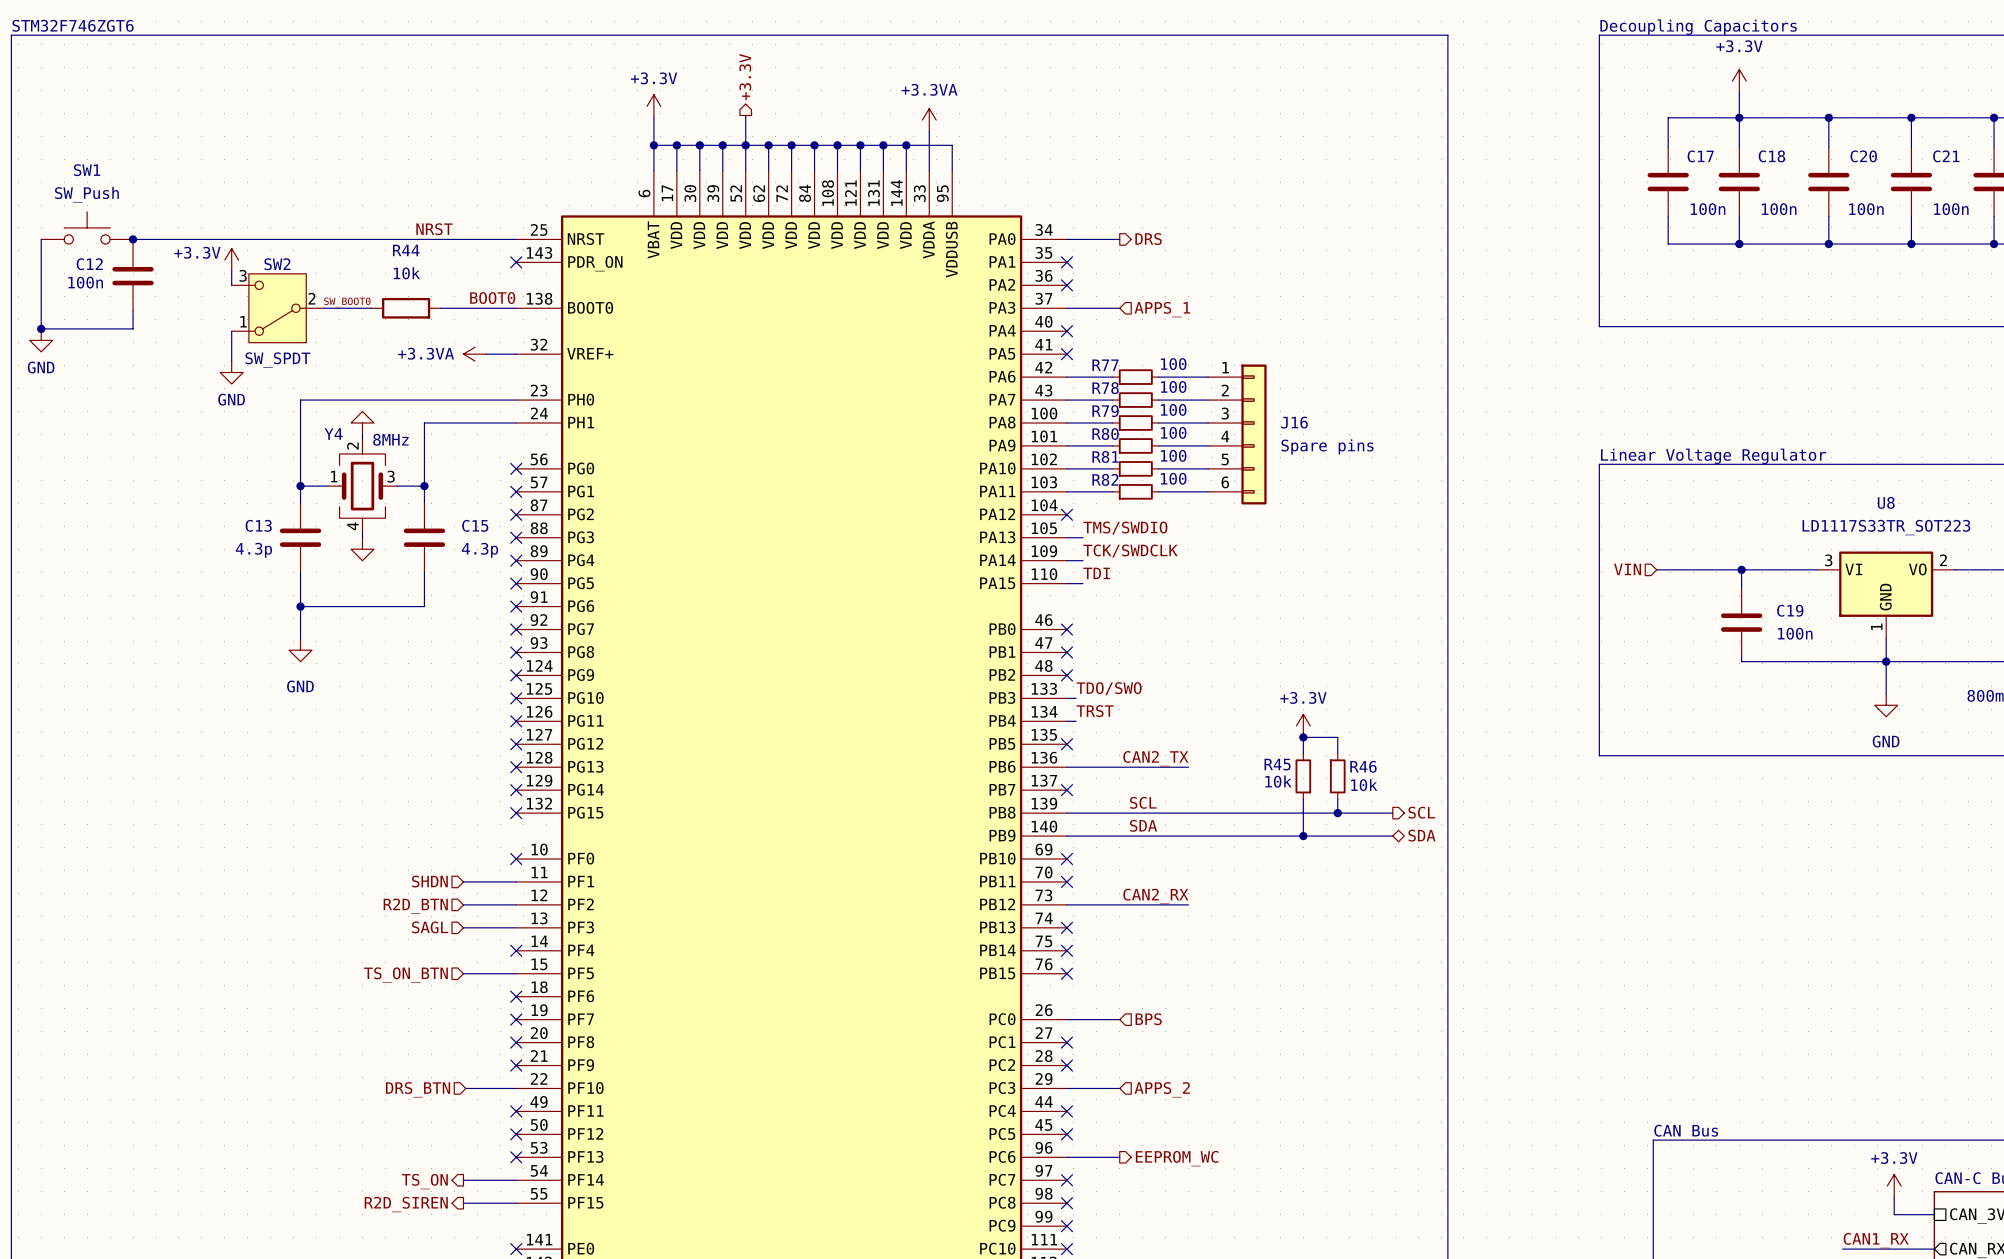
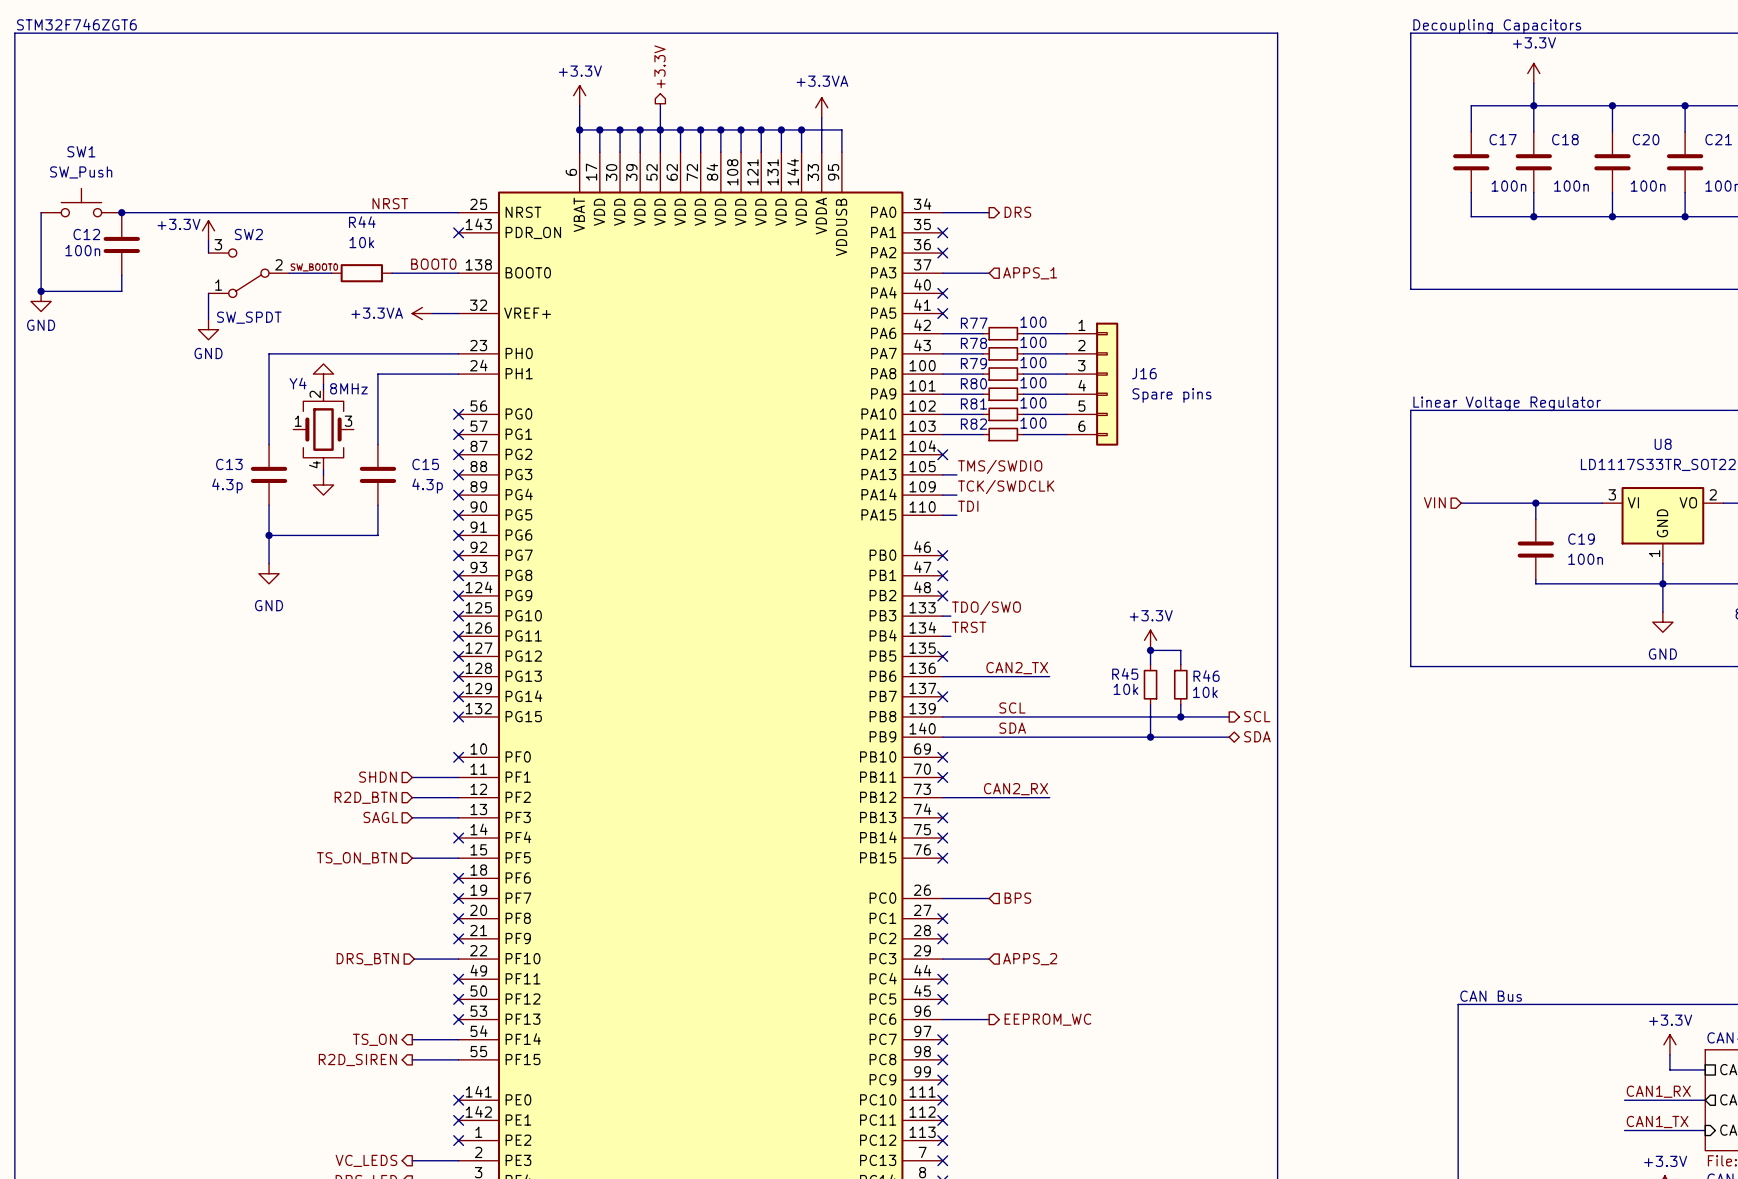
SW2 symbol: [231, 273, 324, 343] -> [208, 248, 290, 298]
wire: (300, 486) (328, 486) -> none
junction: (300, 486) -> none
wire: (396, 486) (424, 486) -> none
junction: (424, 486) -> none

